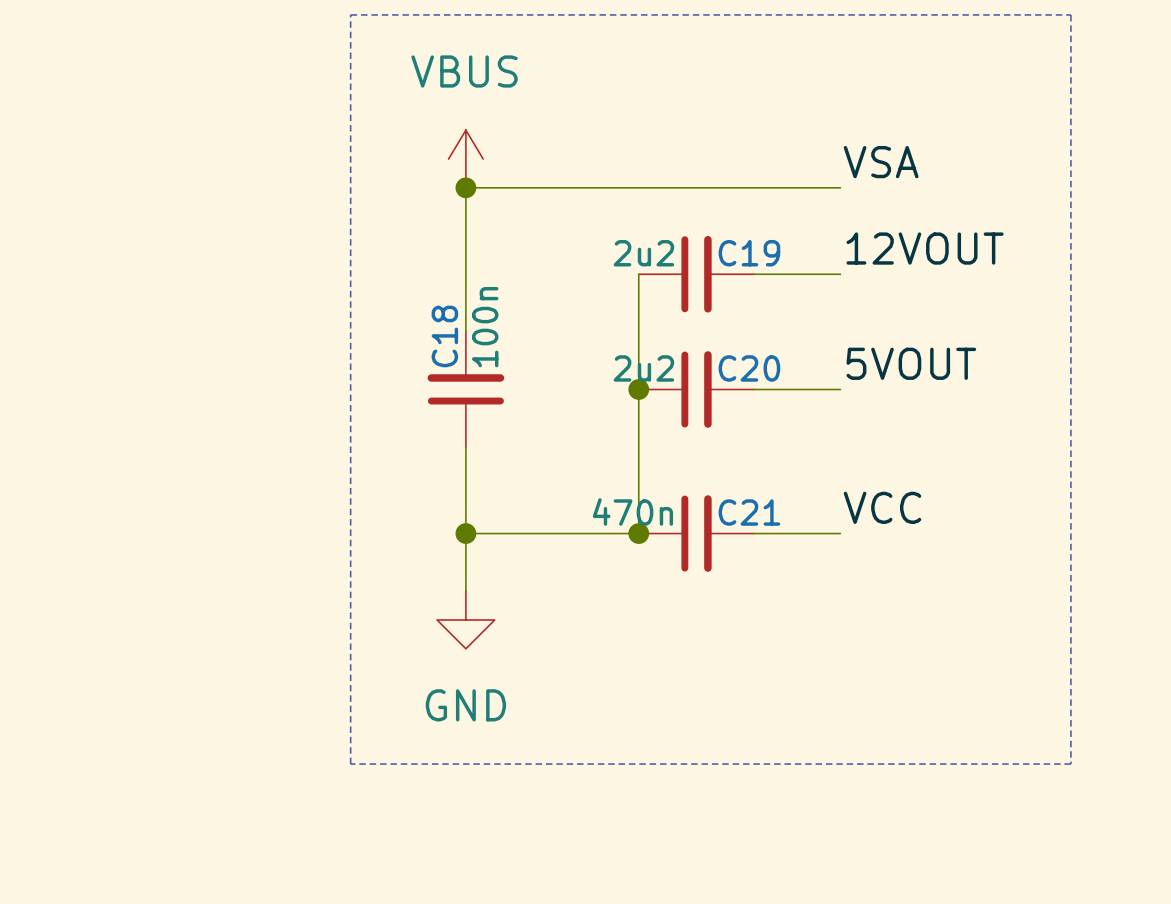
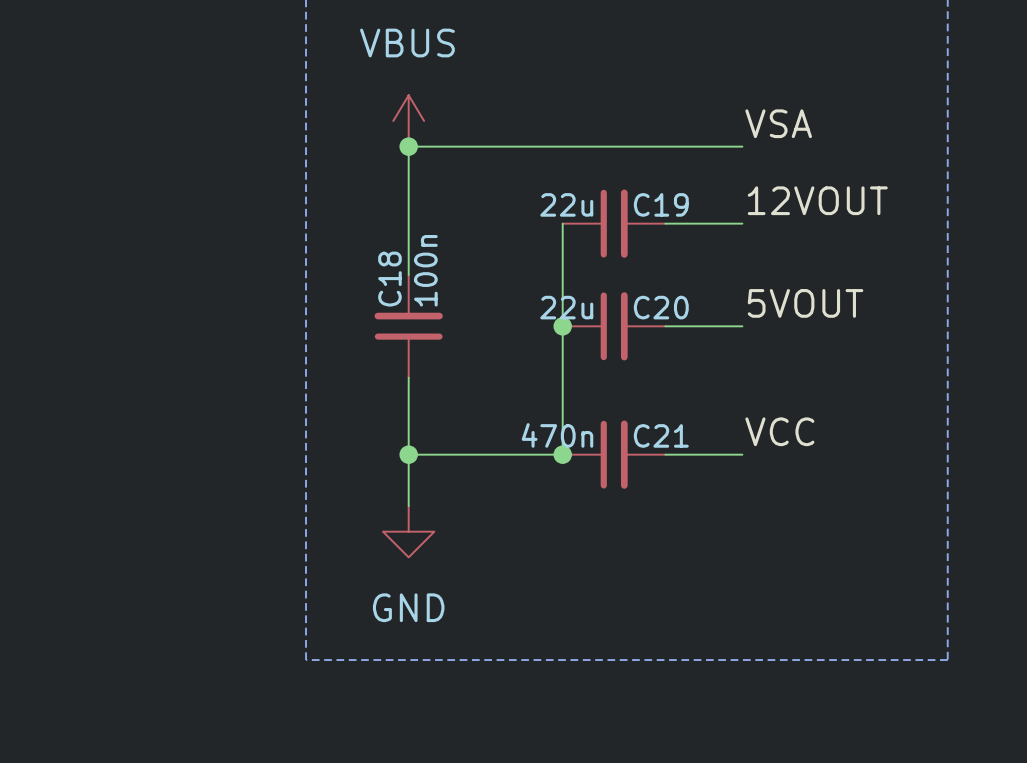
C19 value: 2u2 (643, 253) -> 22u (566, 204)
C20 value: 2u2 (643, 368) -> 22u (566, 307)

